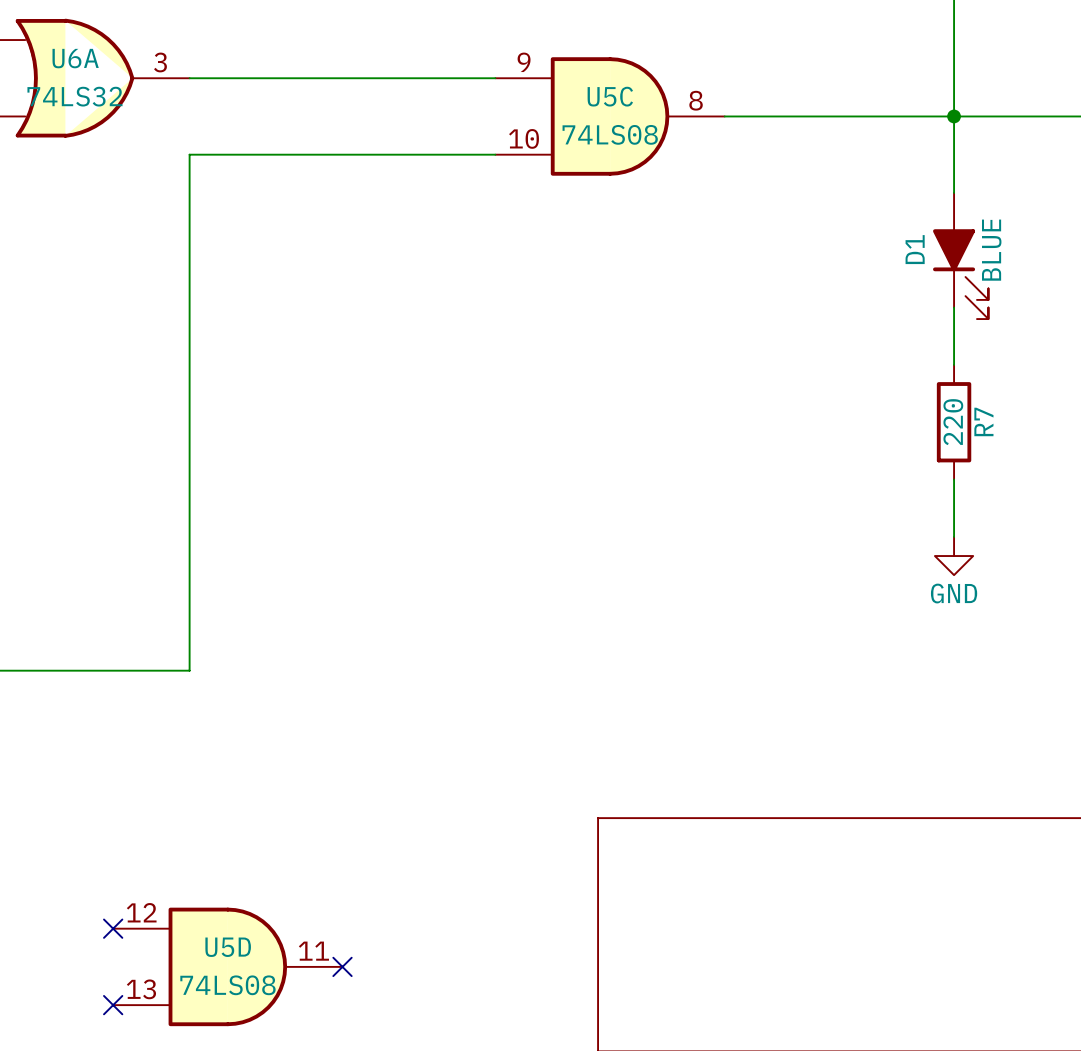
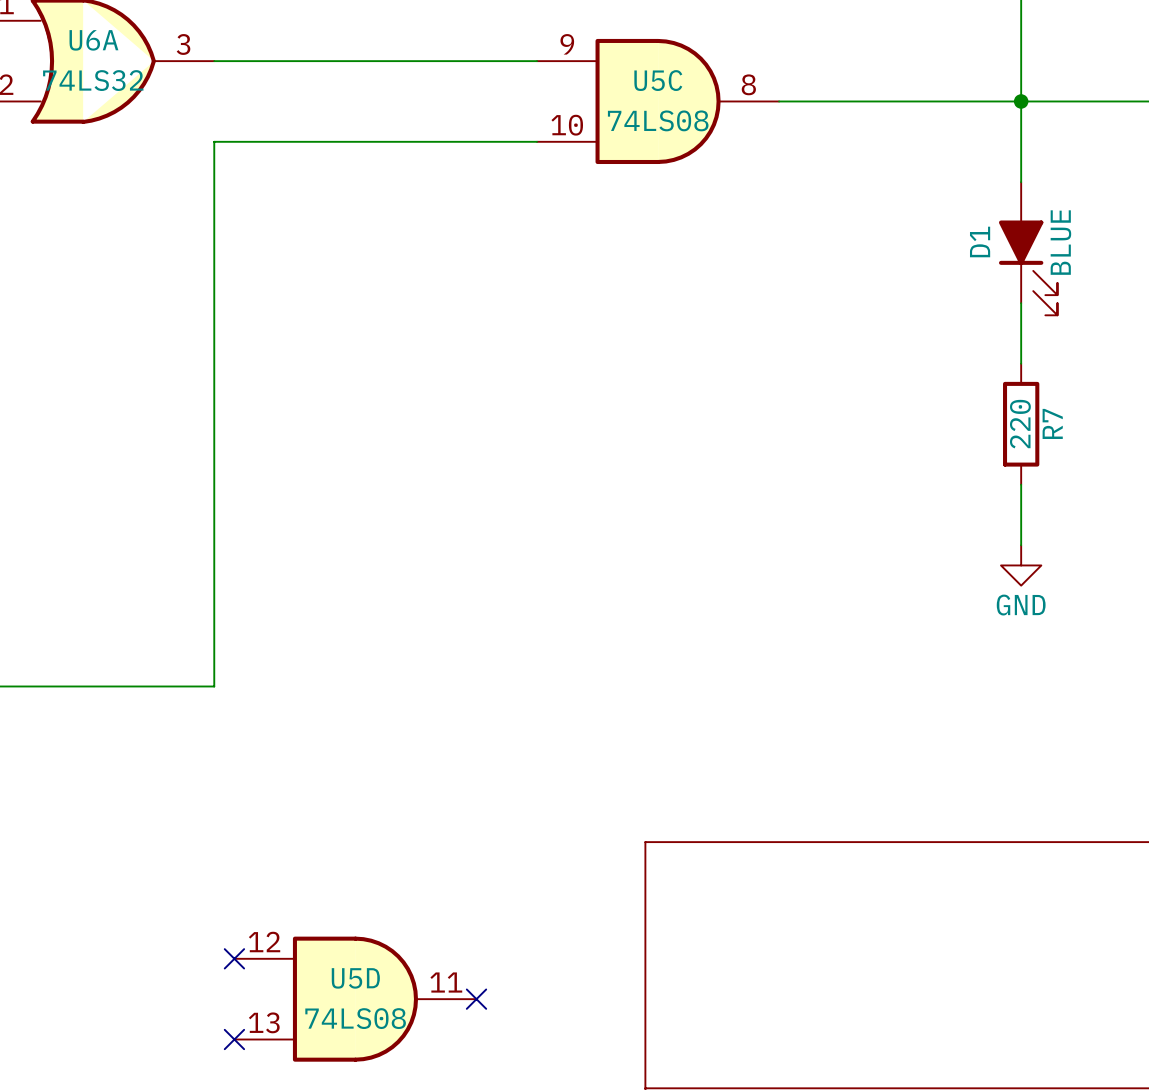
no-connect mark: (113, 928) -> none
no-connect mark: none -> (234, 958)
U5D position: (227, 966) -> (355, 999)
no-connect mark: (342, 966) -> none
no-connect mark: none -> (476, 999)
no-connect mark: (113, 1005) -> none
no-connect mark: none -> (234, 1039)

